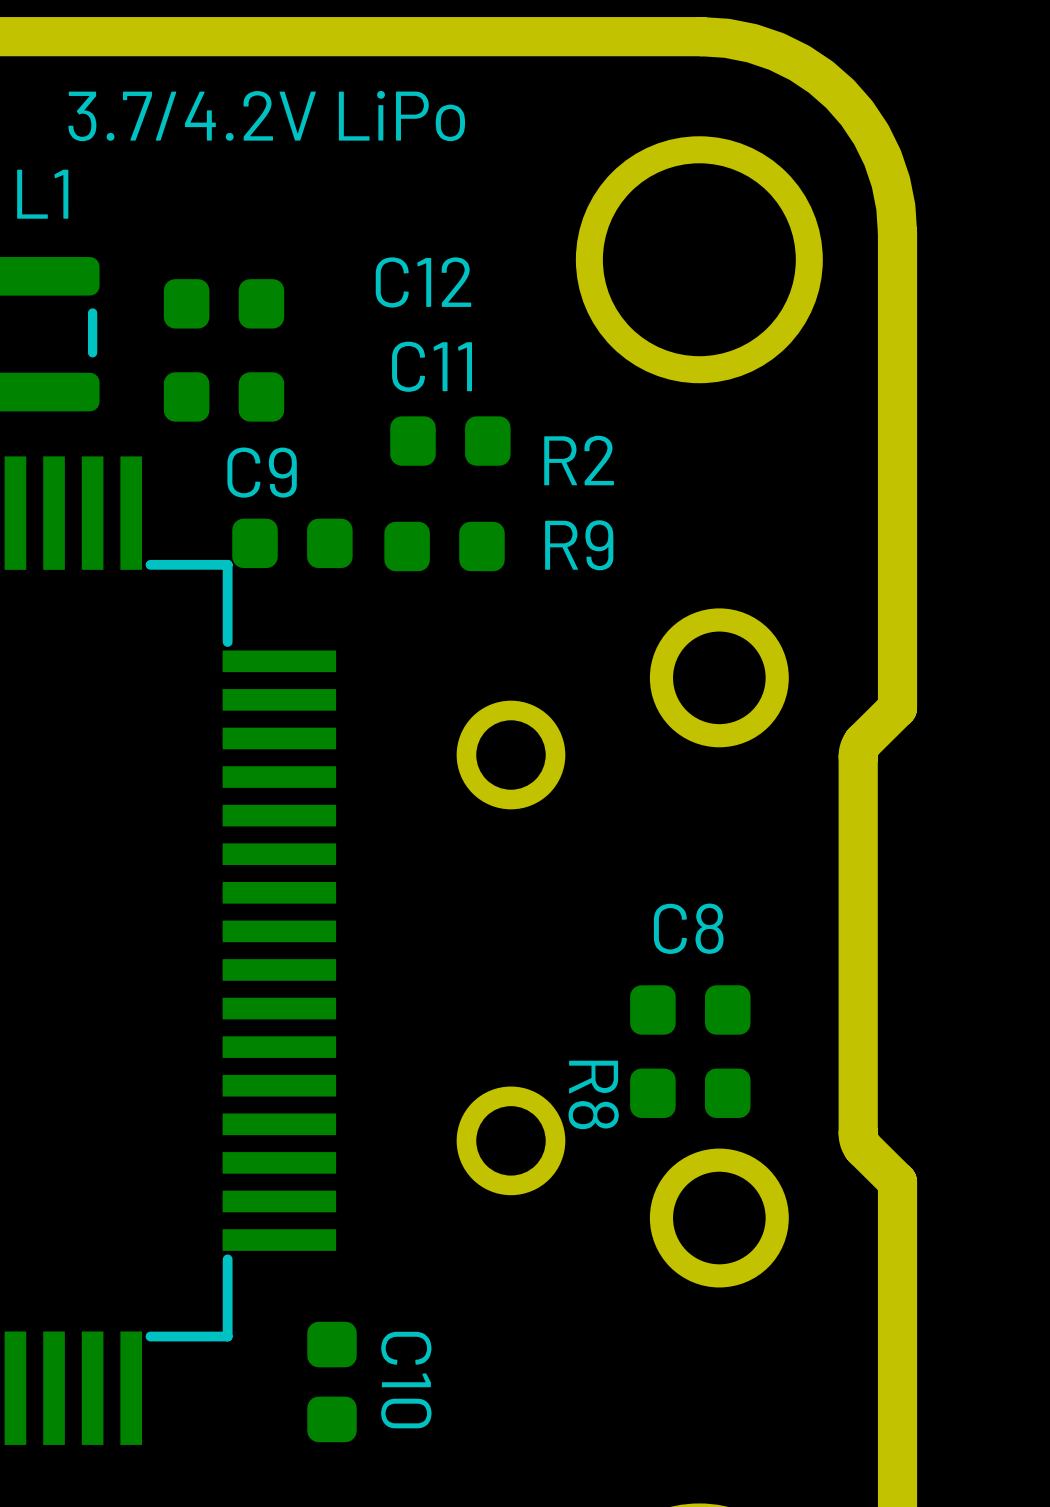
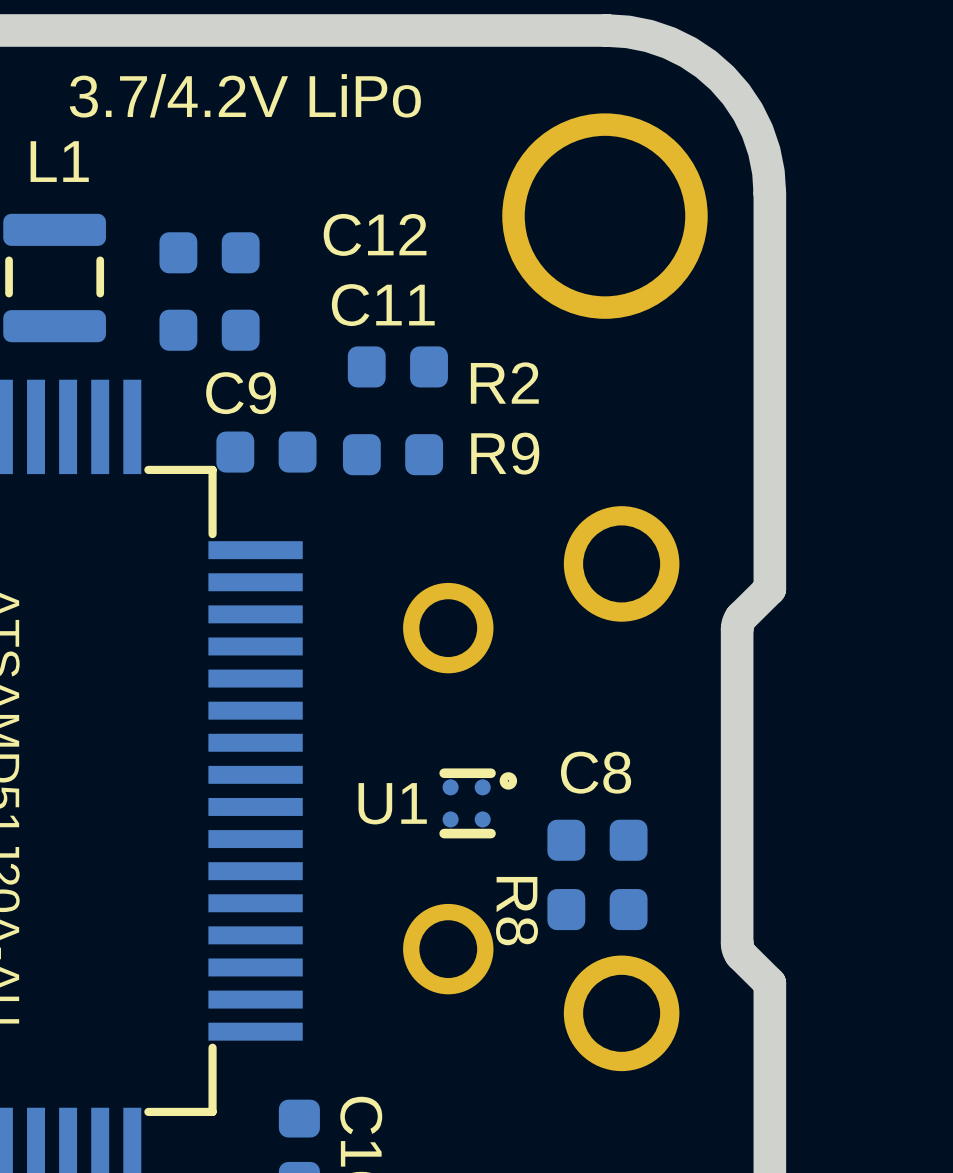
U1: none -> (478, 803)

